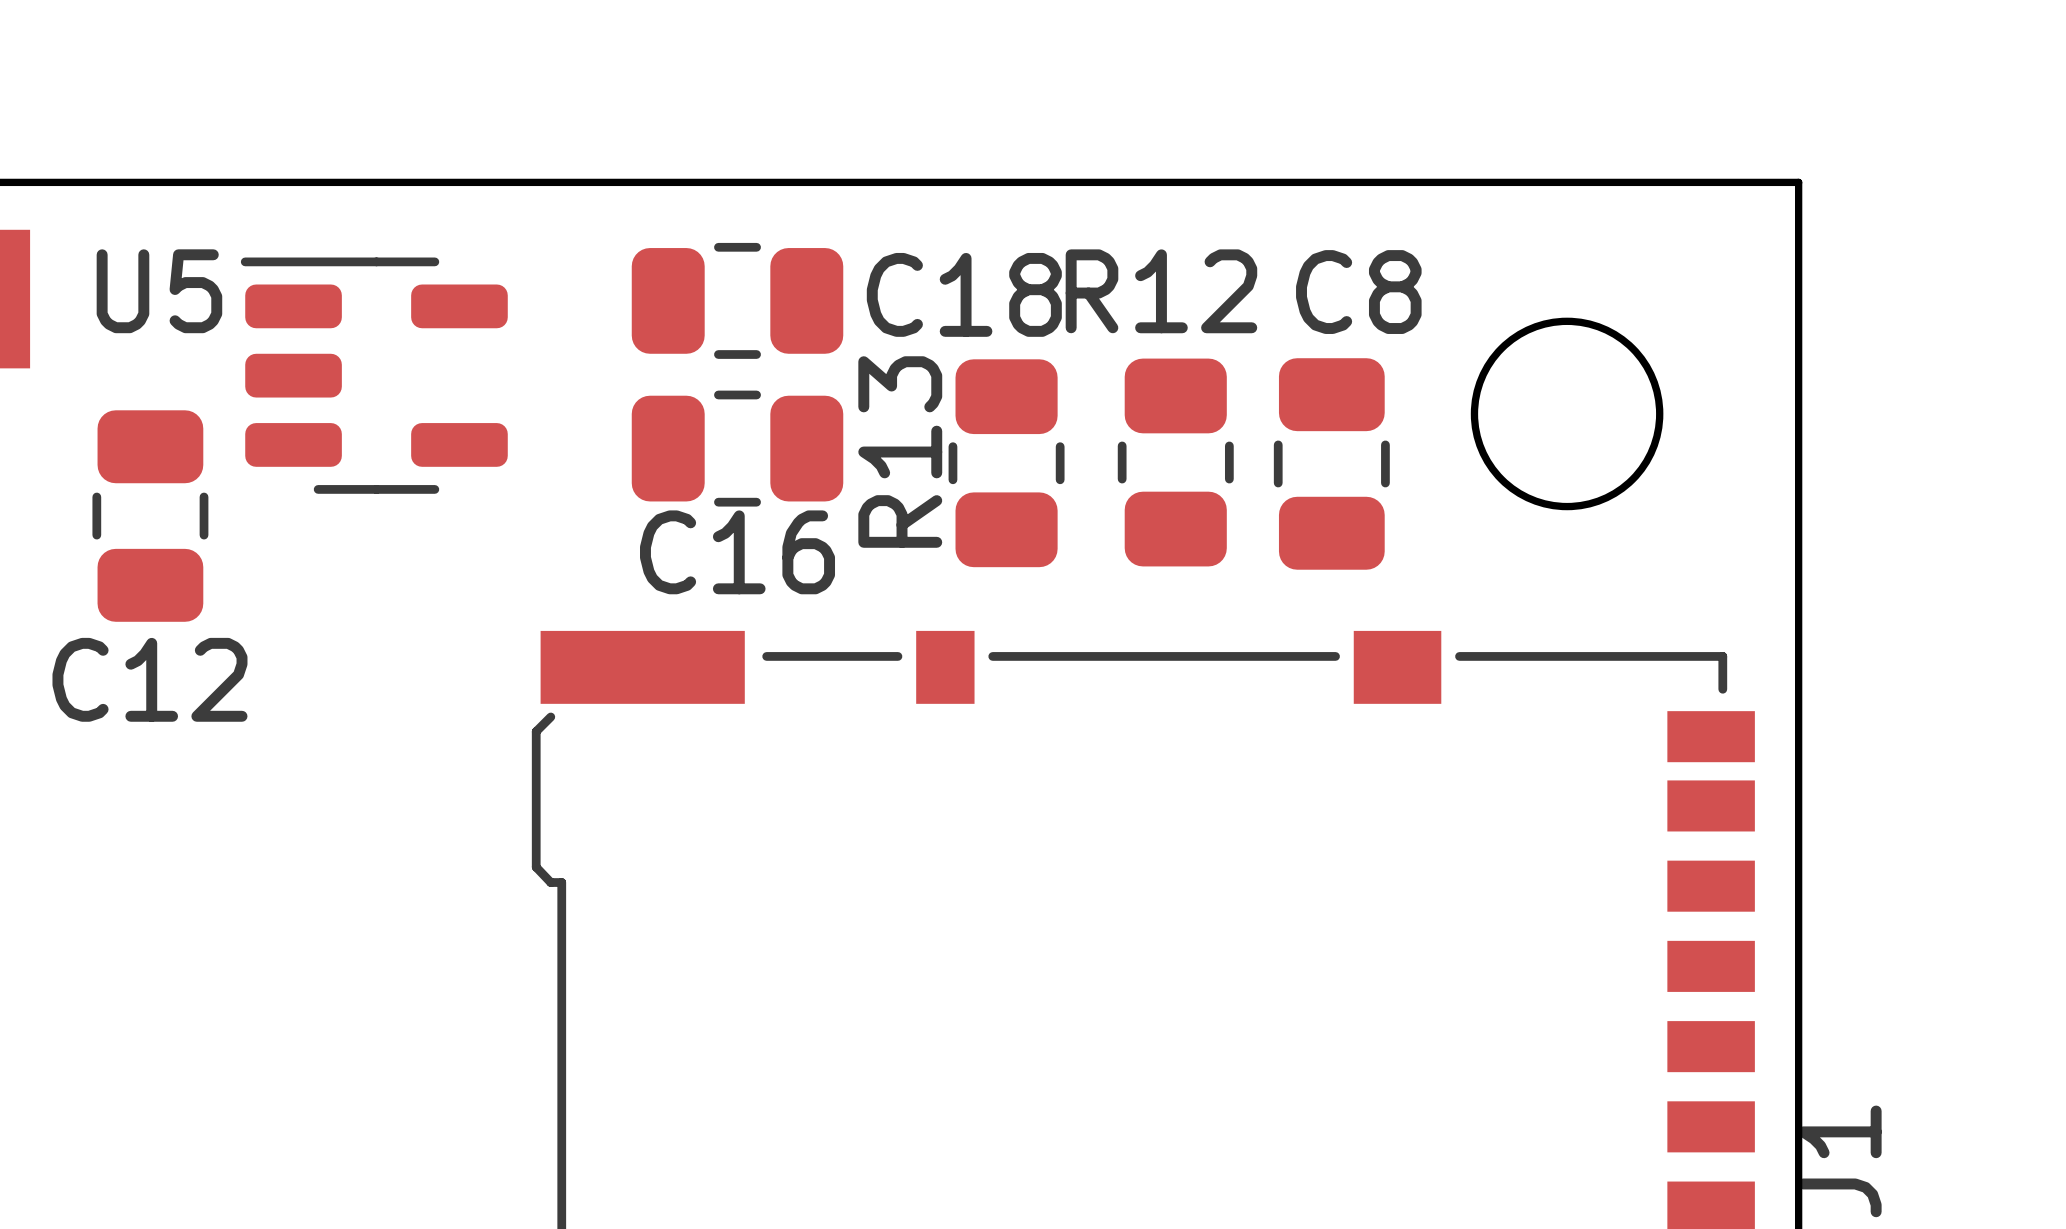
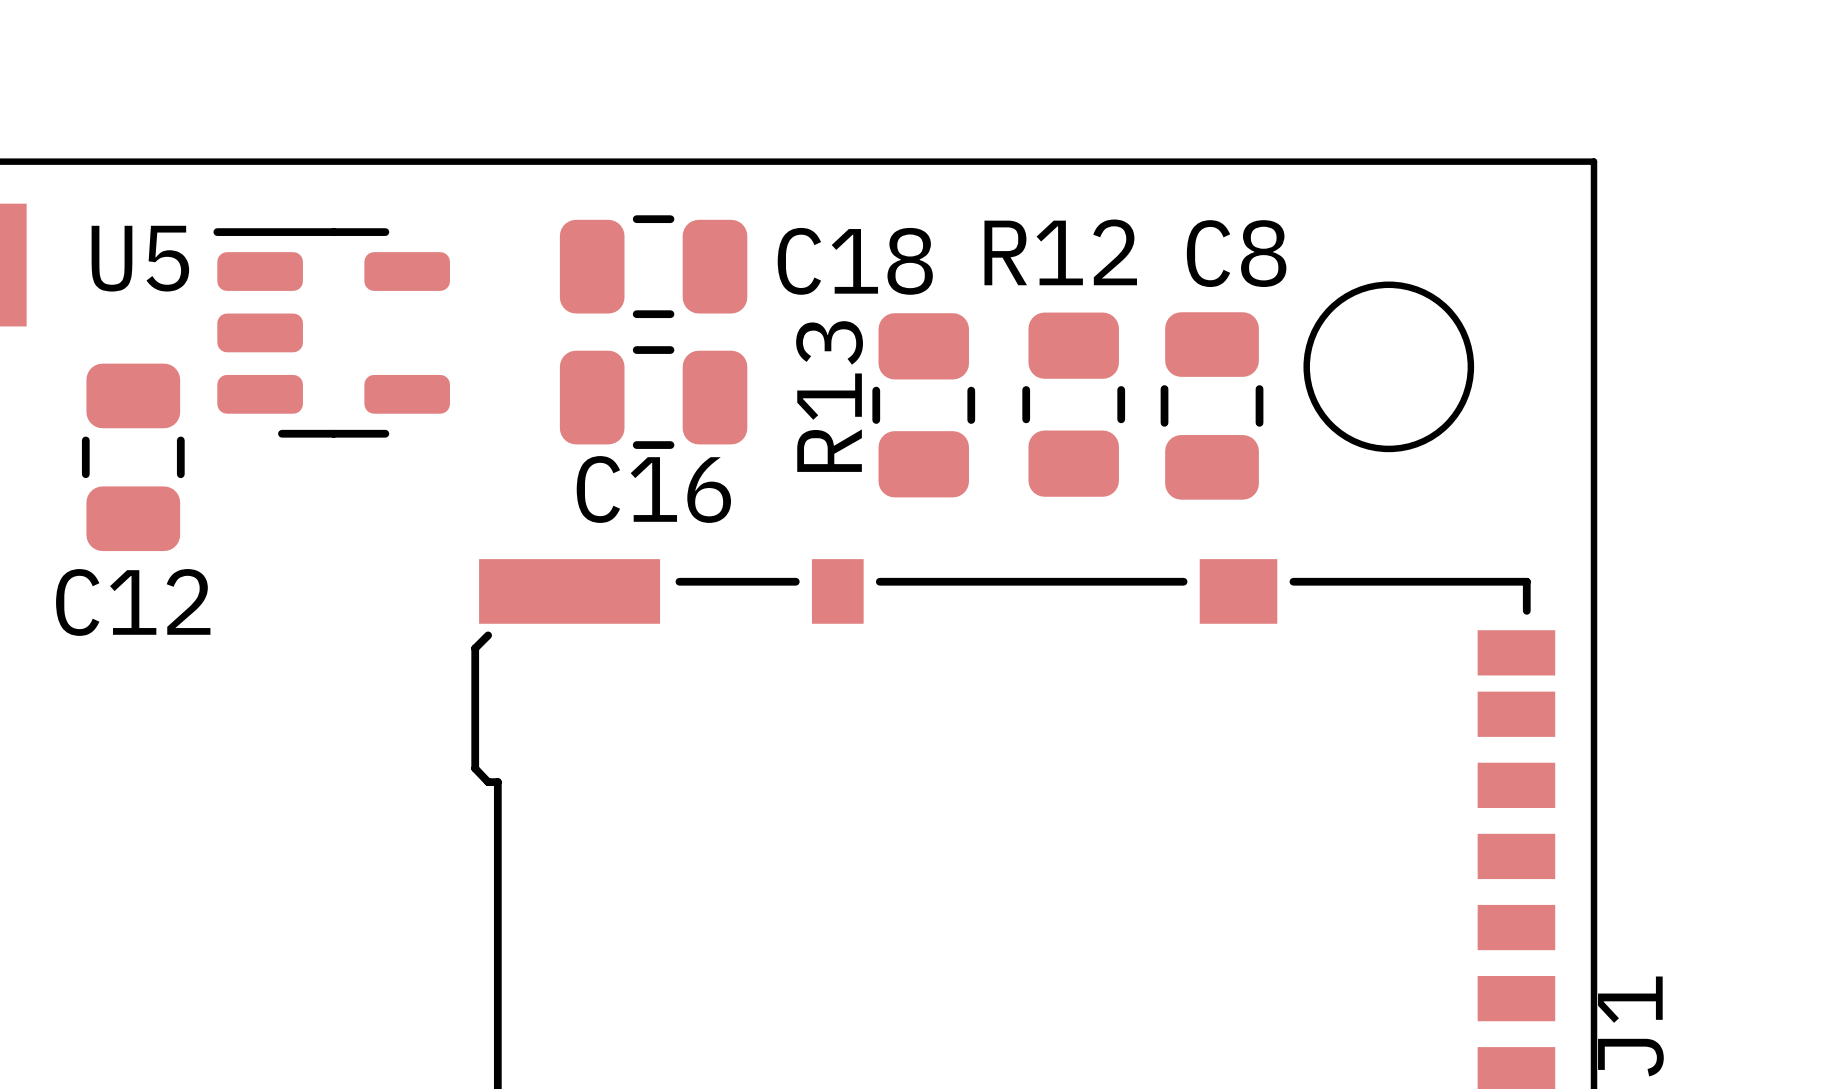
R12 position: (1175, 462) -> (1073, 404)
R13 position: (1006, 463) -> (923, 405)
C8 position: (1331, 463) -> (1212, 405)

